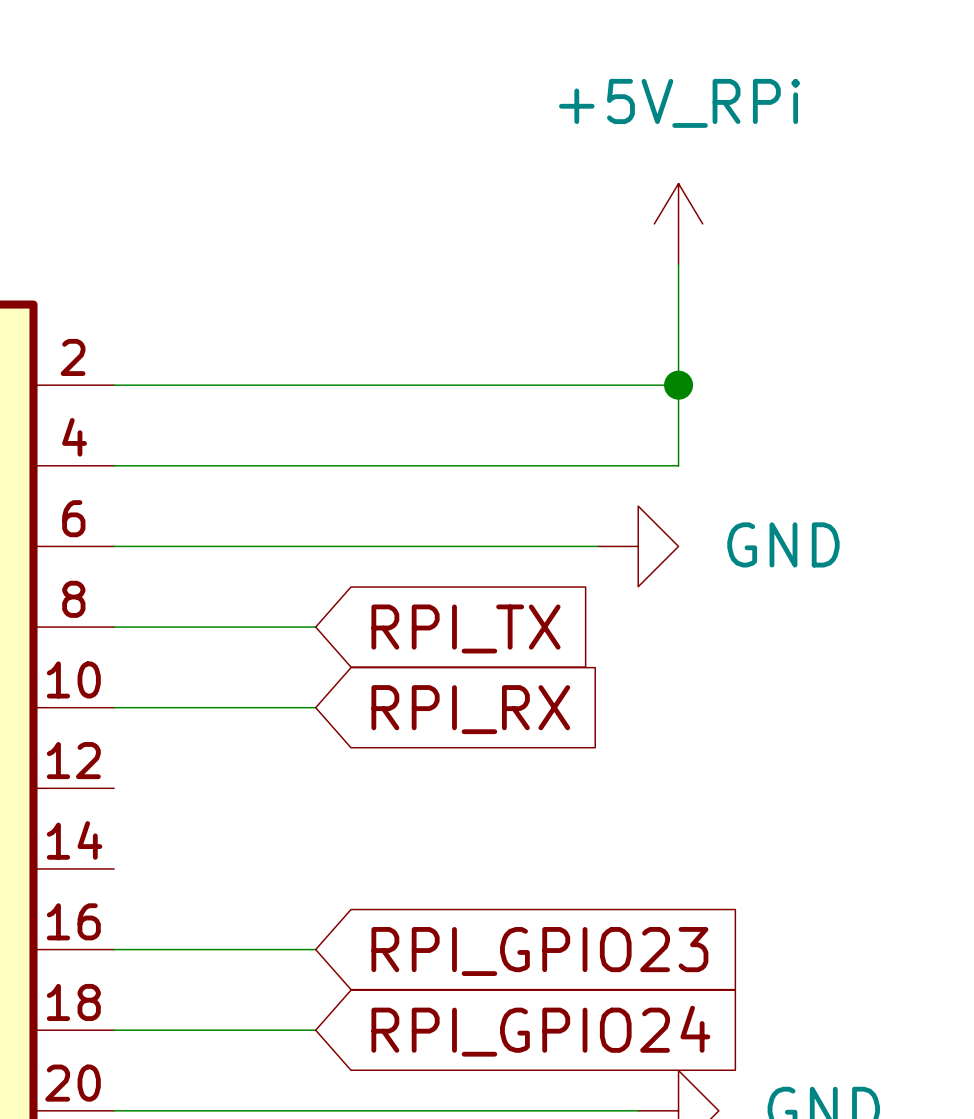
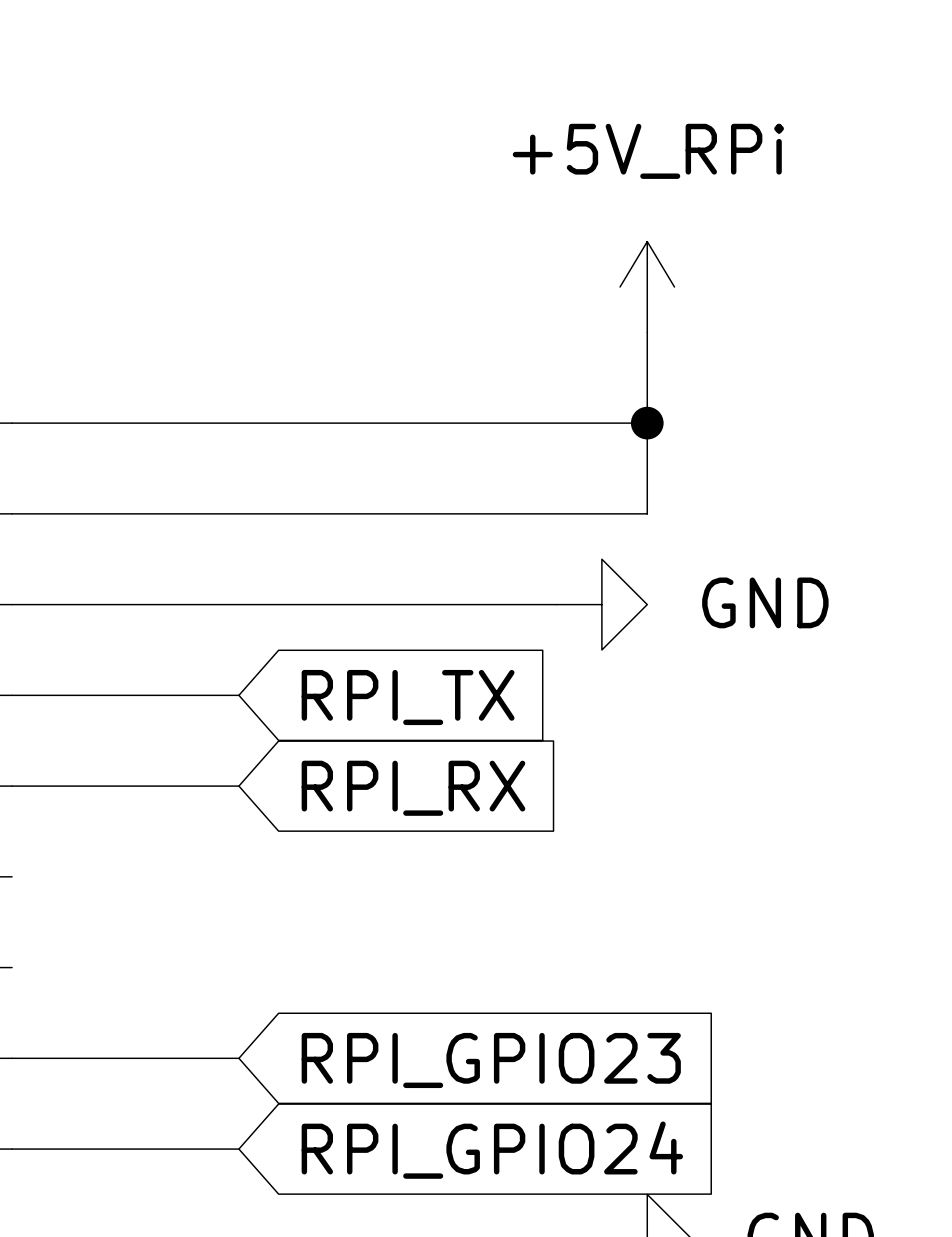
power symbol position: +5V_RPi (678, 223) -> +5V_RPi (647, 287)

